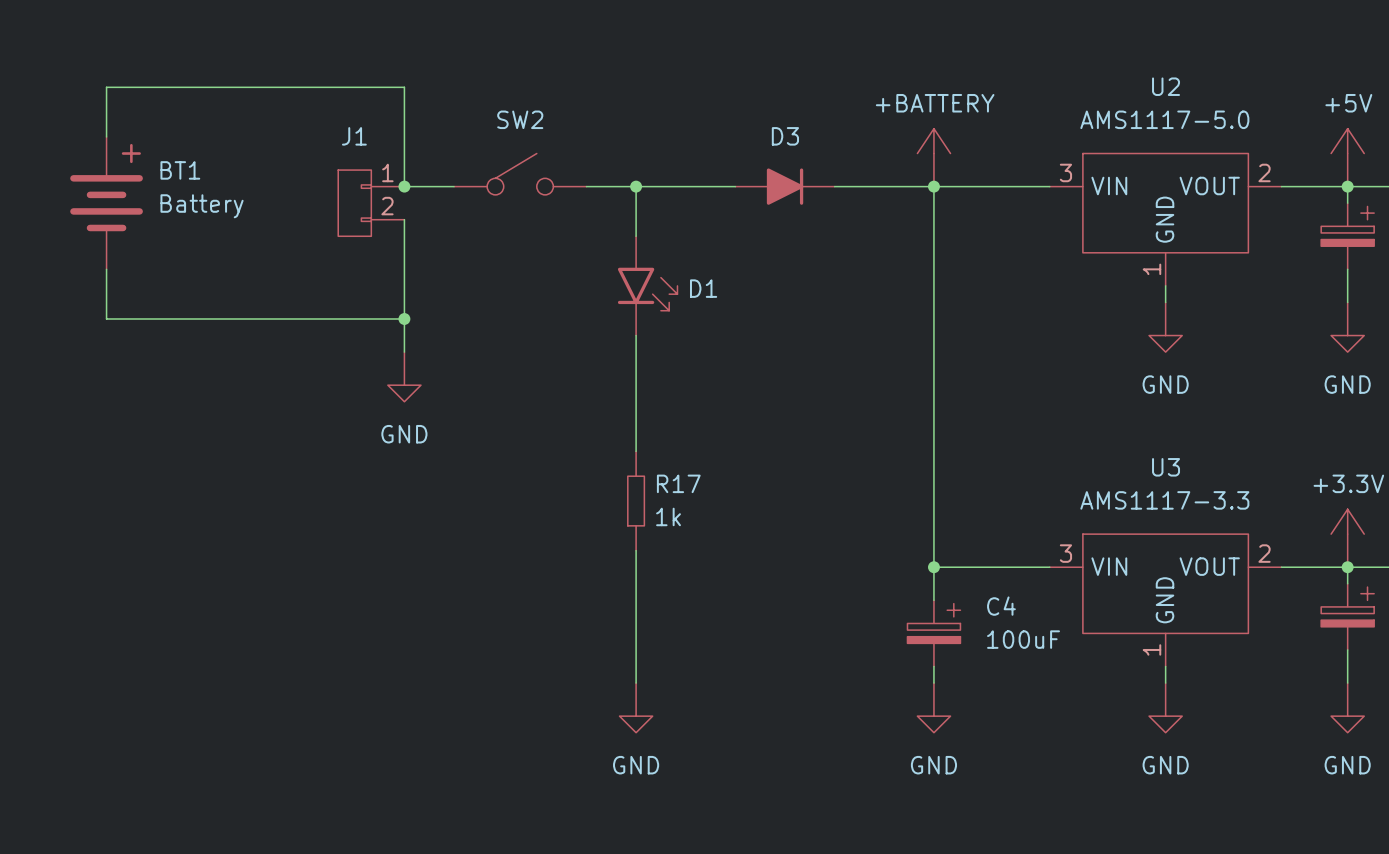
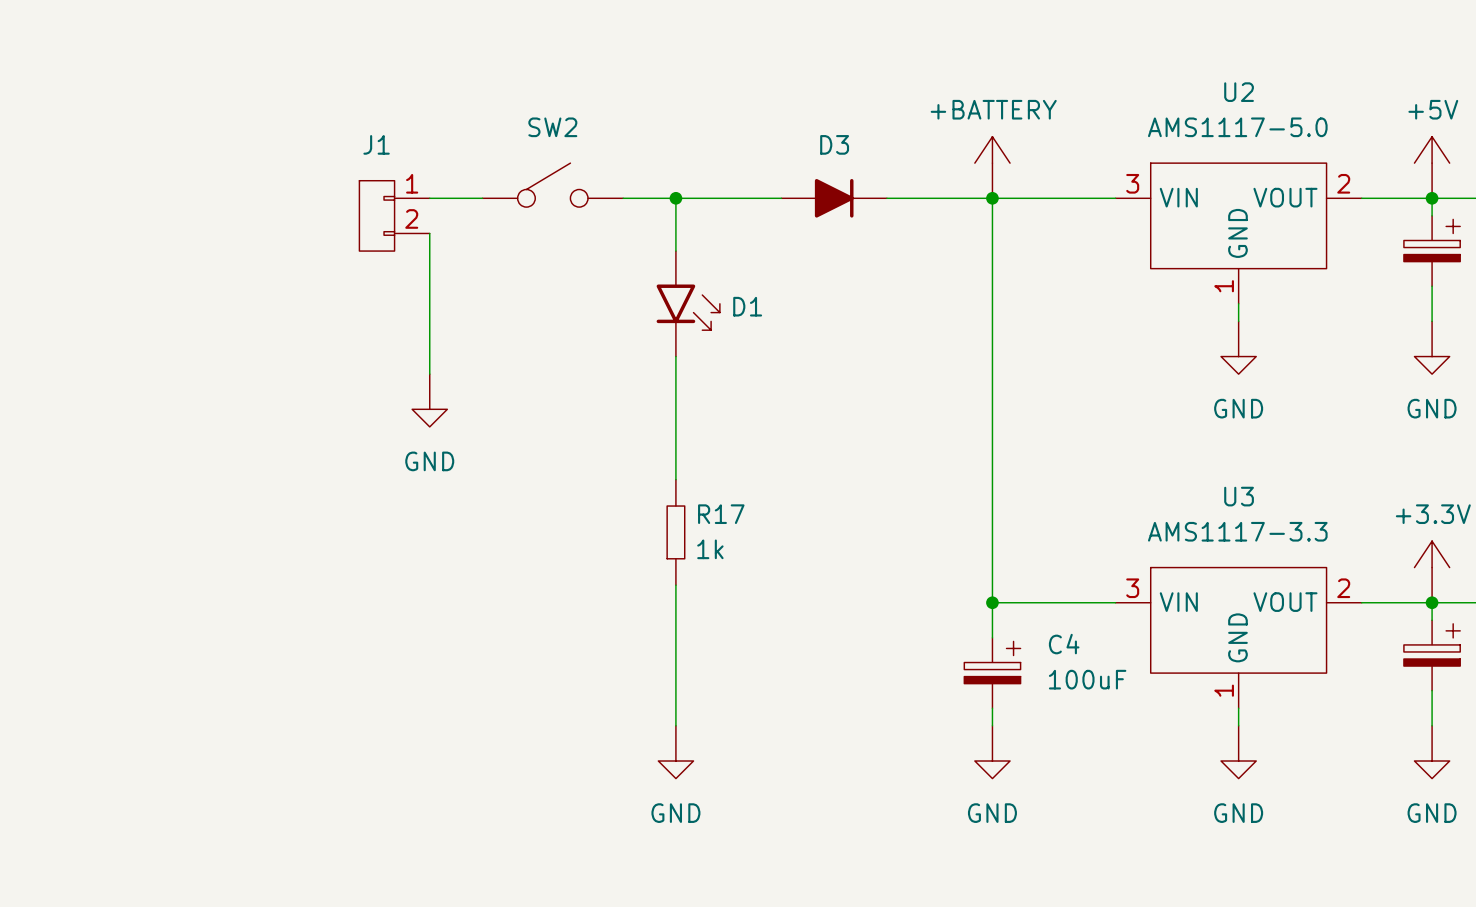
wire: (106, 136) (106, 87) (404, 87) (404, 186) -> none
junction: (404, 186) -> none
BT1: Battery (106, 203) -> none
wire: (106, 269) (106, 319) (404, 319) -> none
junction: (404, 319) -> none

